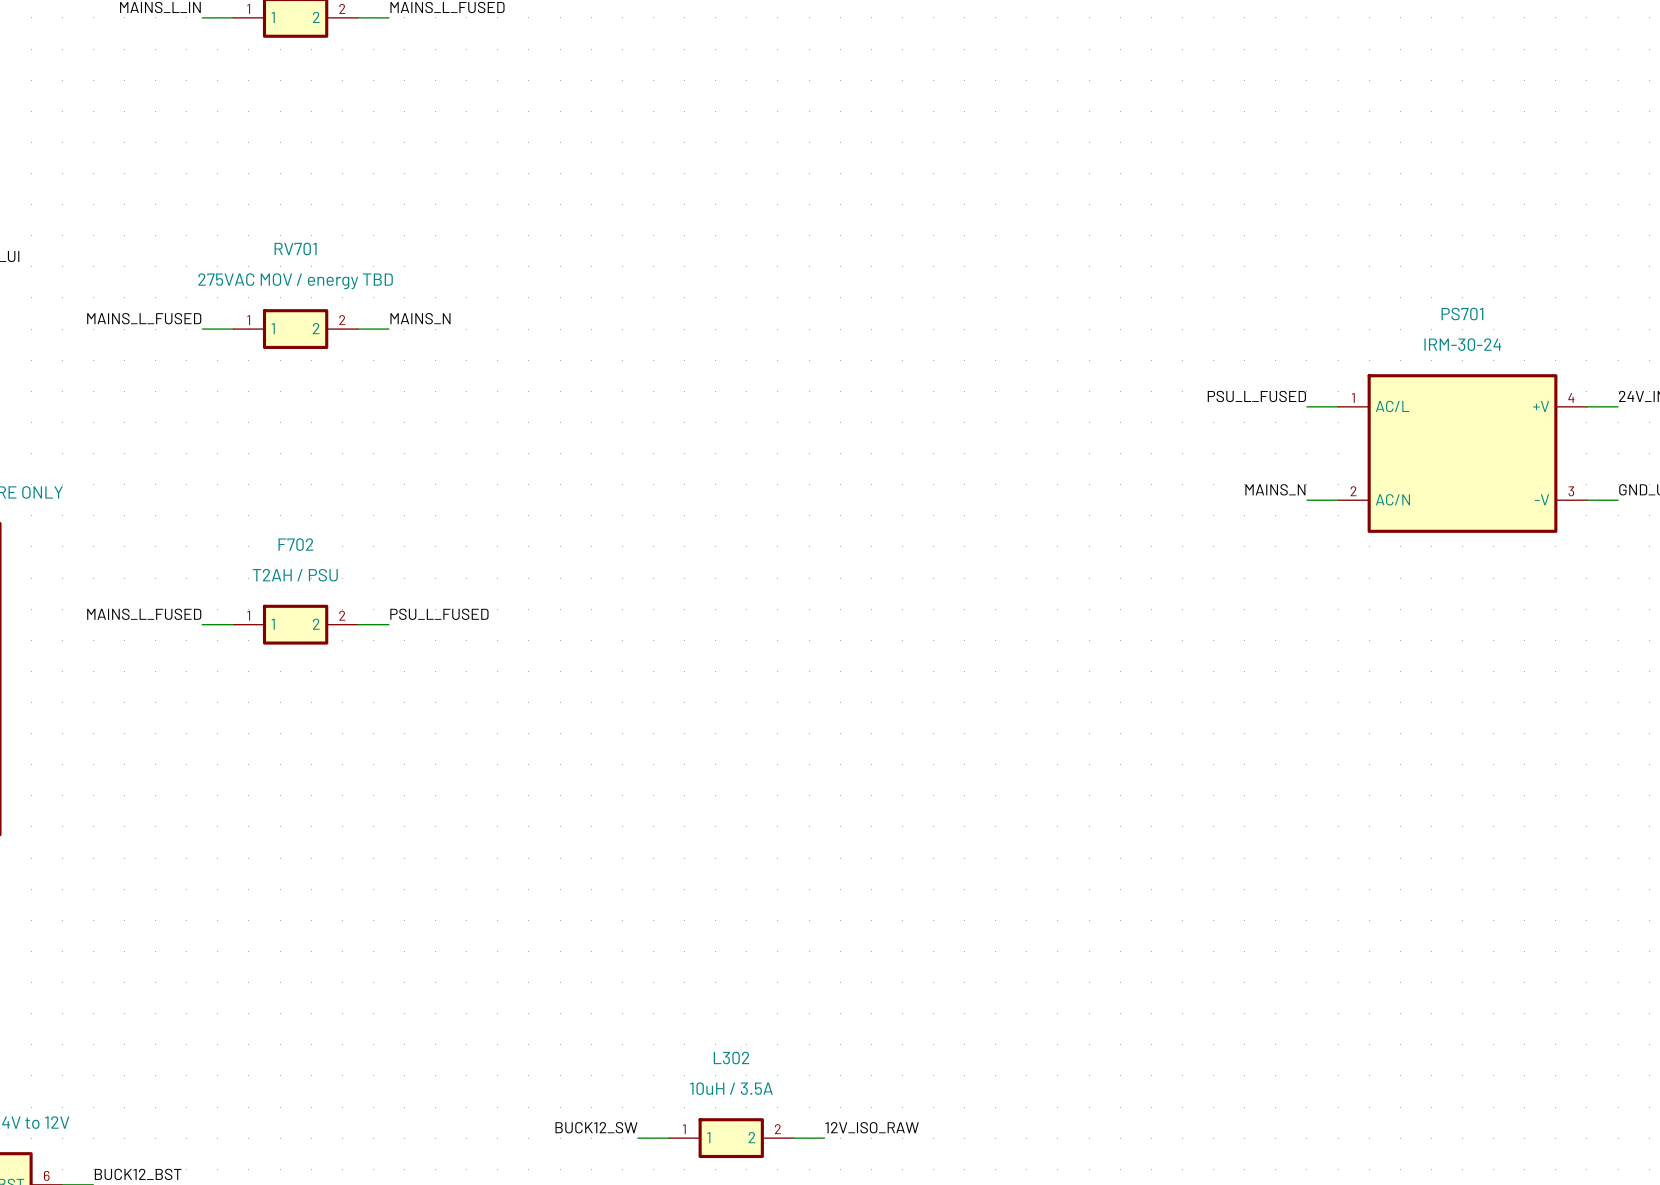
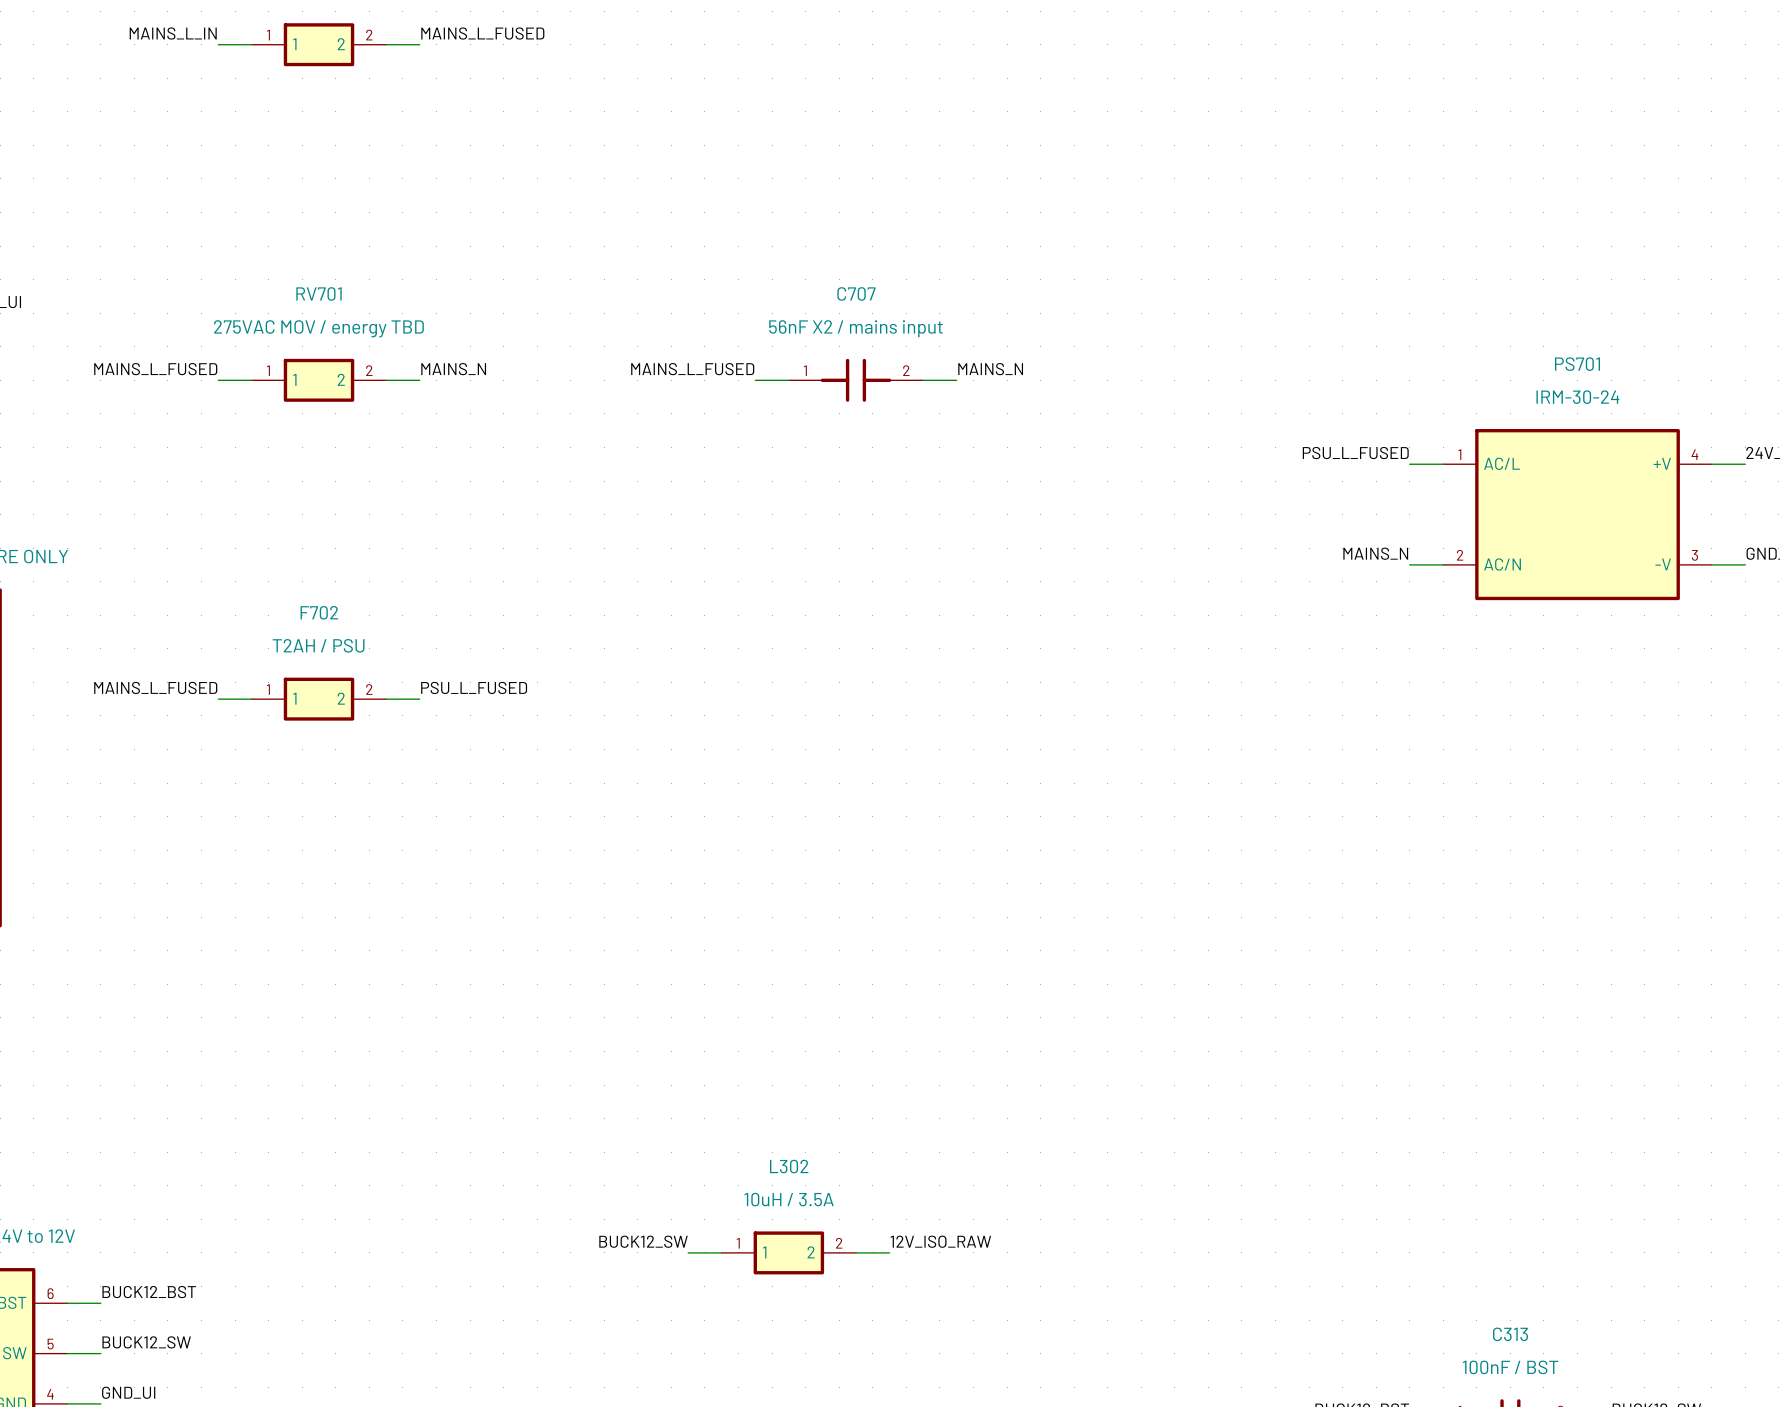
label: none -> MAINS_L_FUSED (692, 369)
label: none -> MAINS_N (990, 369)
wire: none -> (755, 380) (788, 380)
C707: none -> 56nF X2 / mains input (855, 380)
wire: none -> (923, 380) (956, 380)

